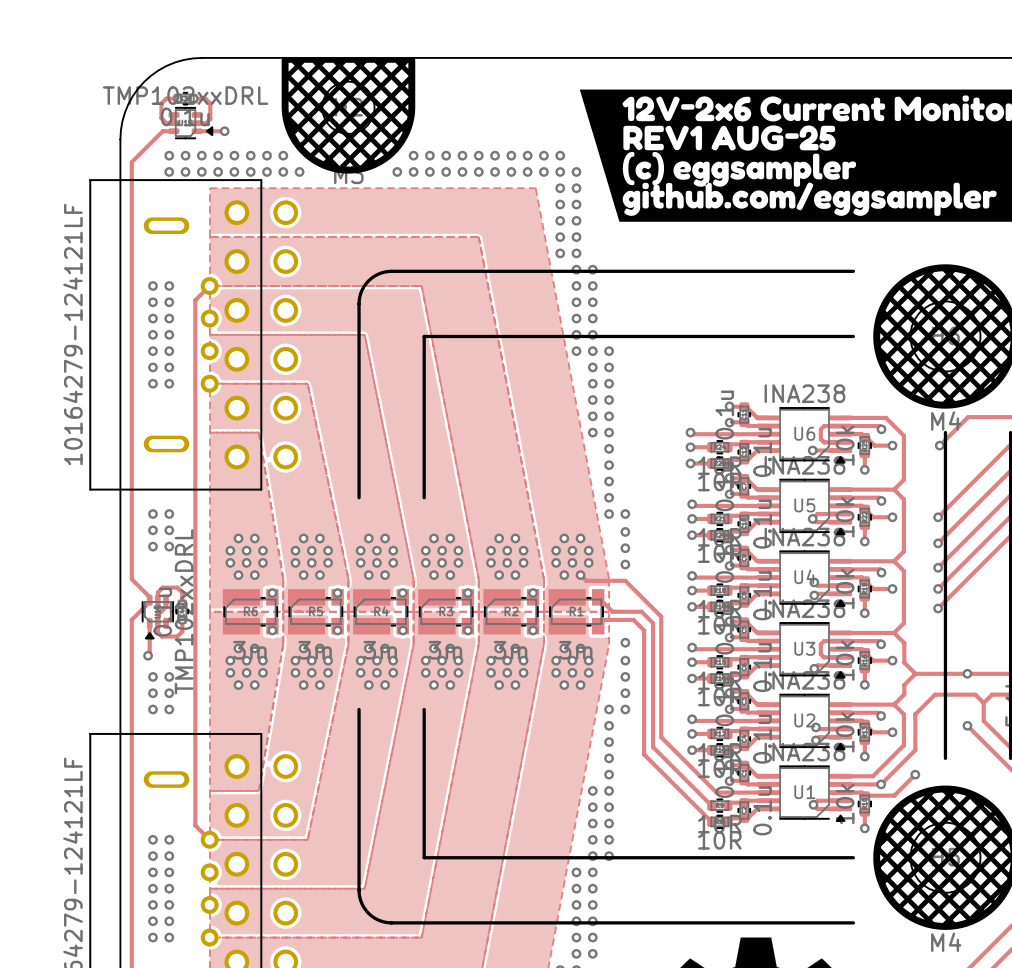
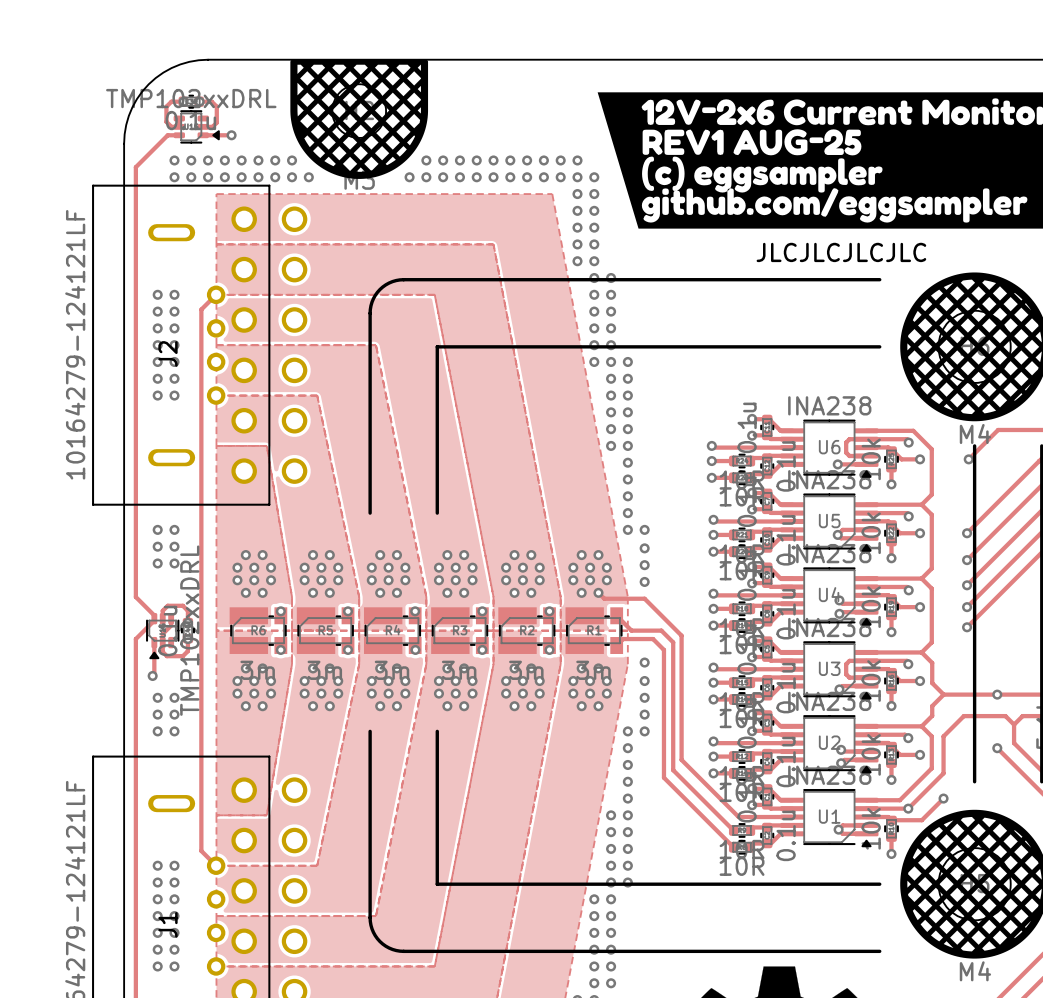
text: none -> JLCJLCJLCJLC (841, 252)
J2 name: none -> J2 (167, 353)
J1 name: none -> J1 (167, 924)

